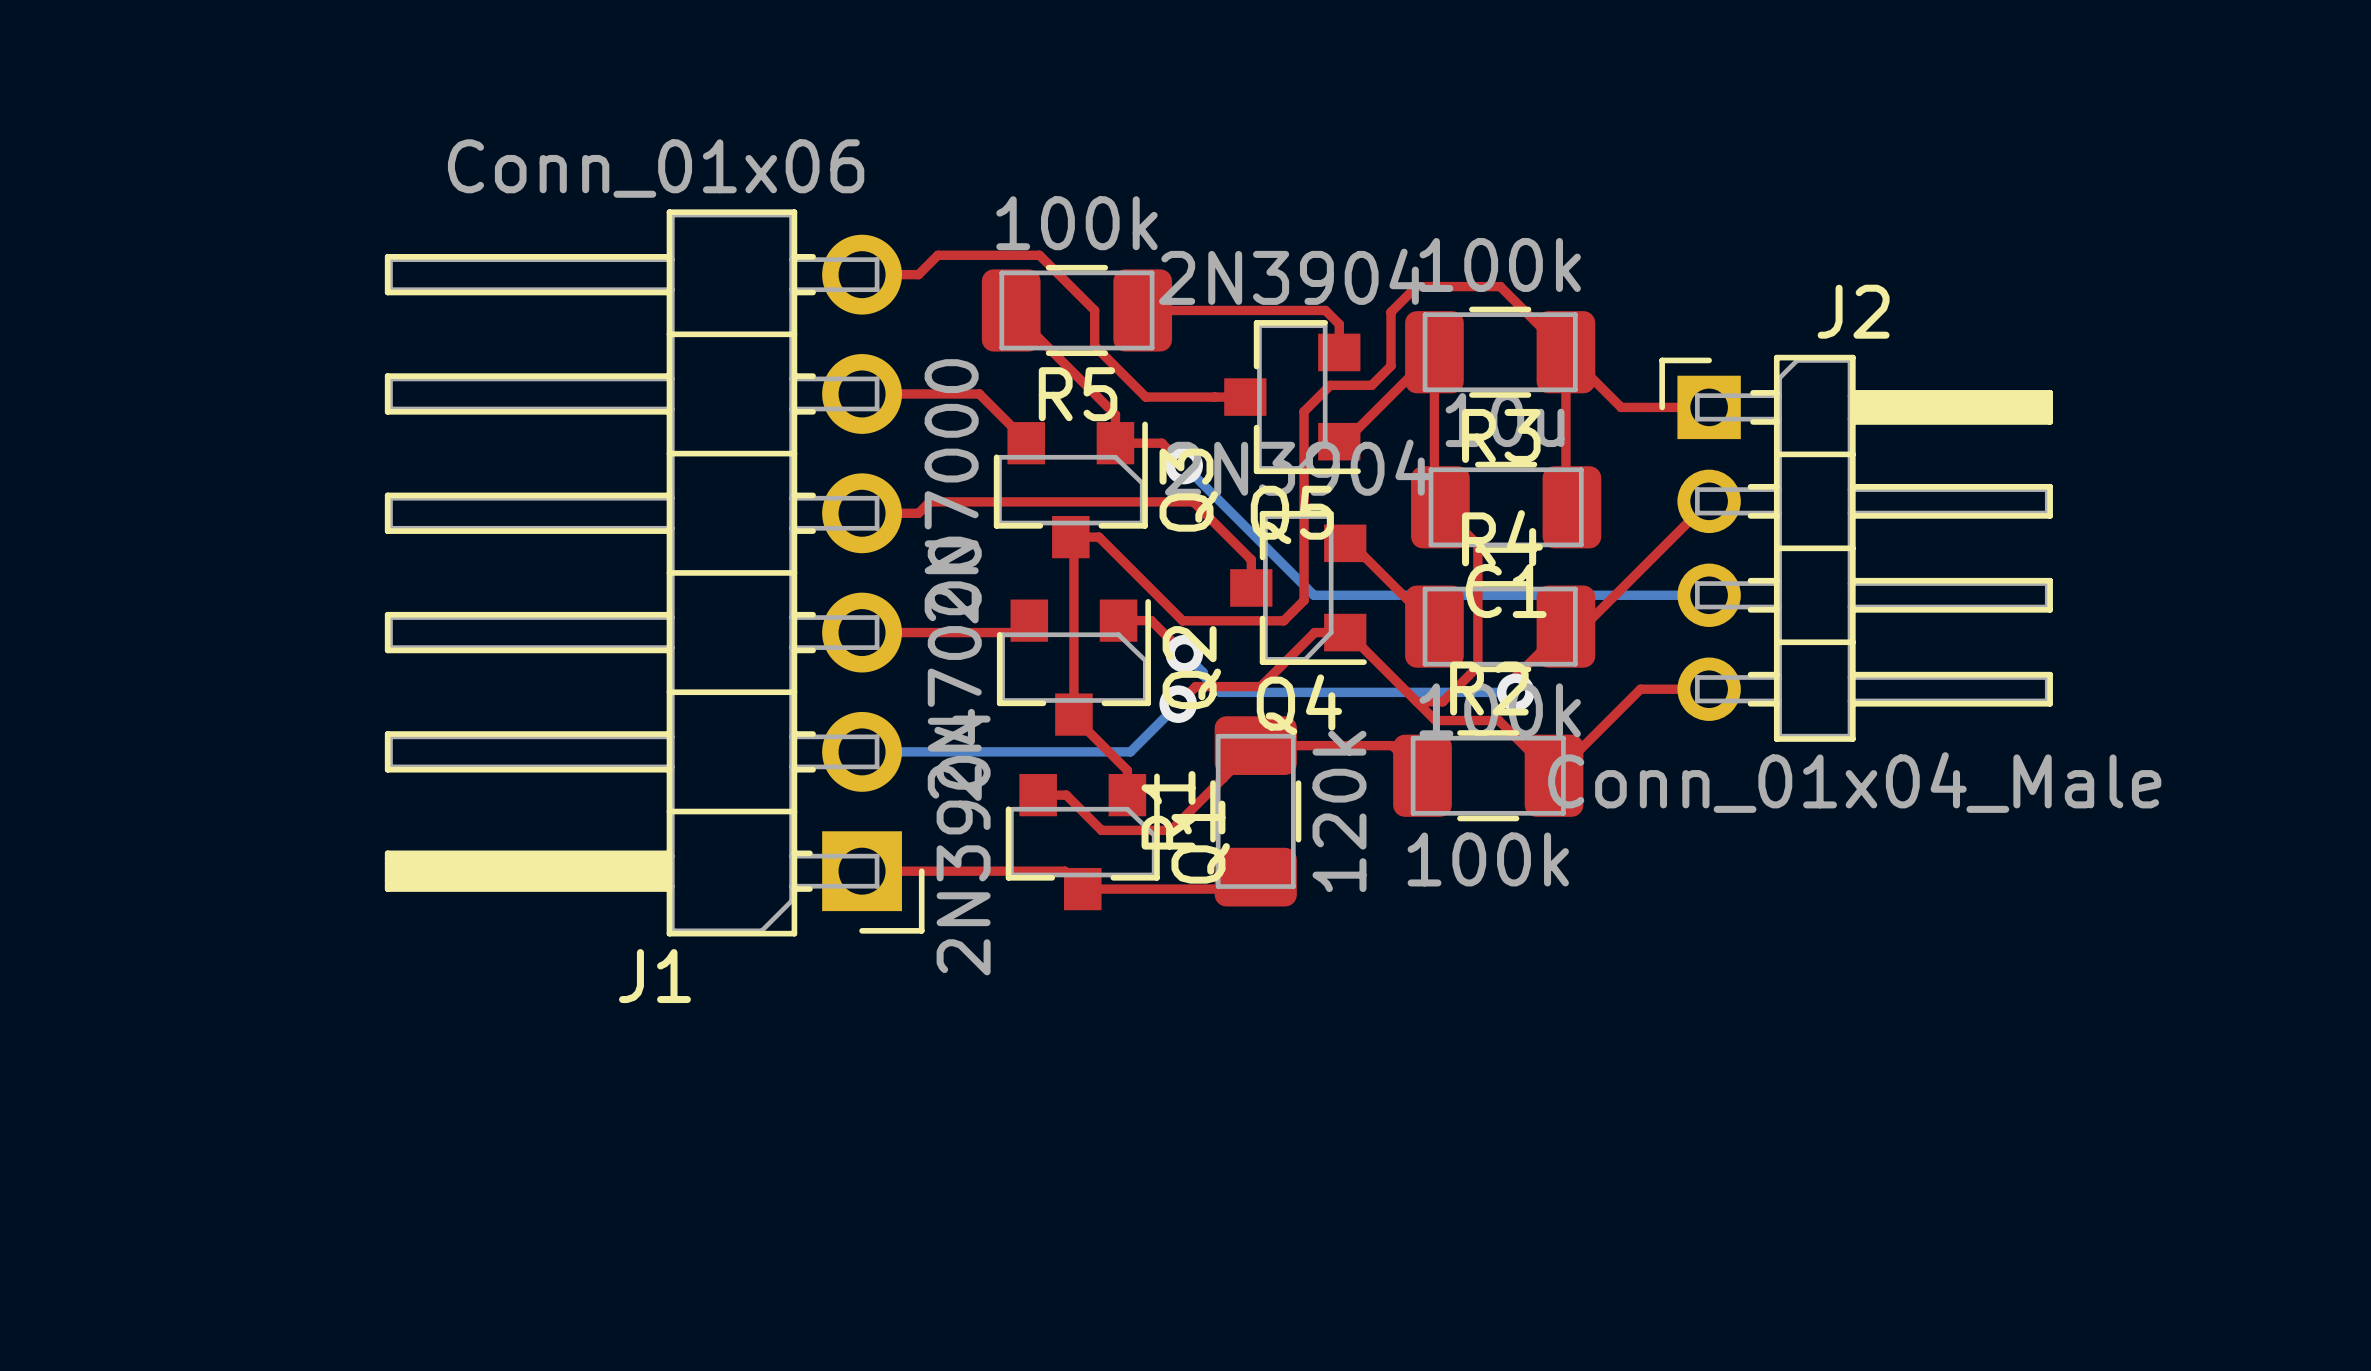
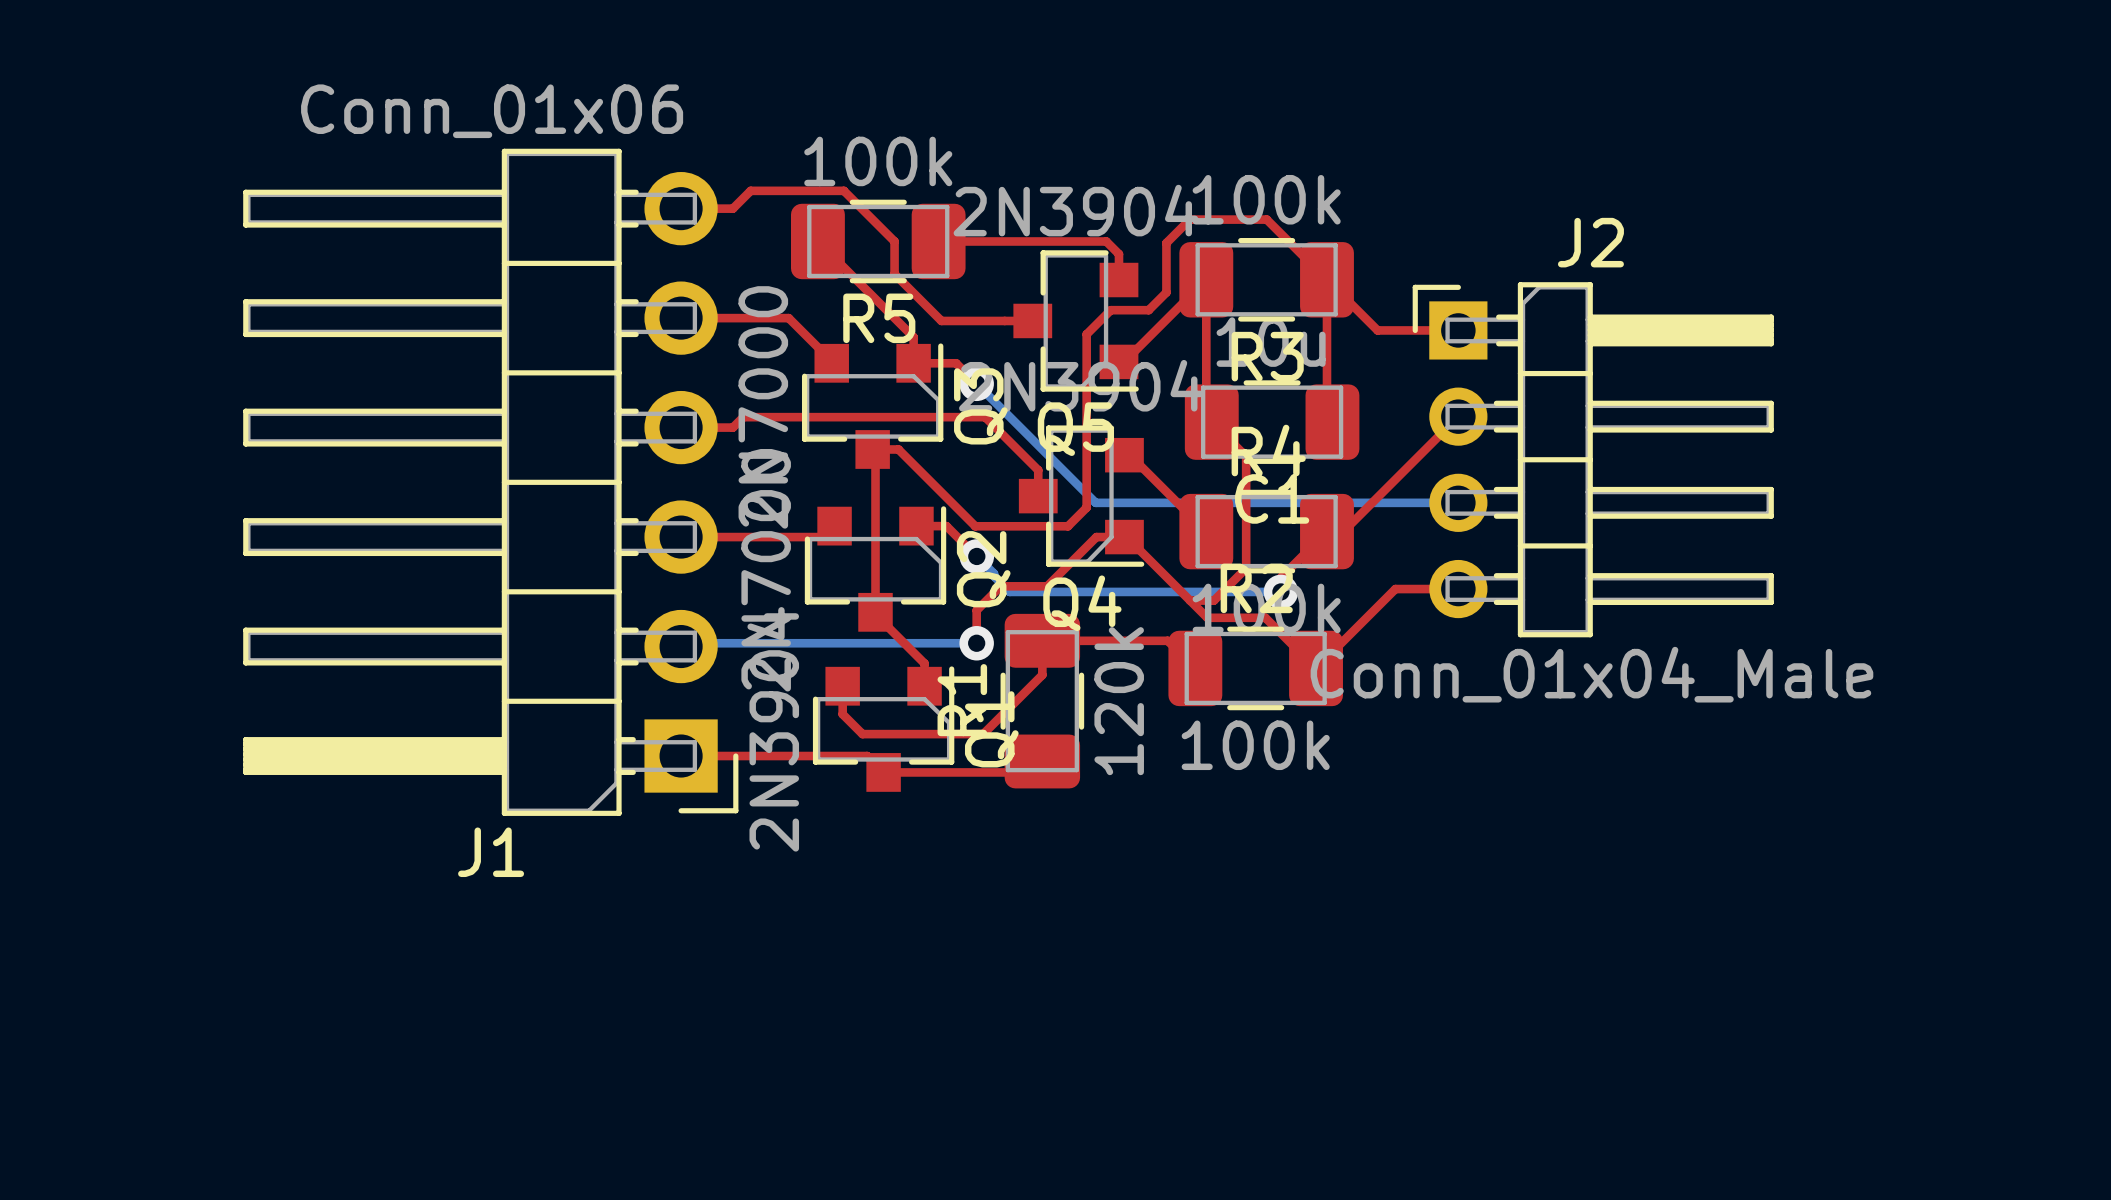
top track: (1260, 686) (1195, 686) (1178, 704) -> (1047, 586) (1000, 586) (976, 610) (976, 643)
bottom track: (1178, 704) (1130, 751) (862, 751) -> (976, 643) (684, 643) (681, 646)
via position: (1178, 704) -> (976, 643)
top track: (1255, 745) (1171, 830) (1101, 830) (1066, 795) (1038, 795) -> (1042, 640) (1042, 675) (983, 734) (862, 734) (842, 714) (842, 686)

